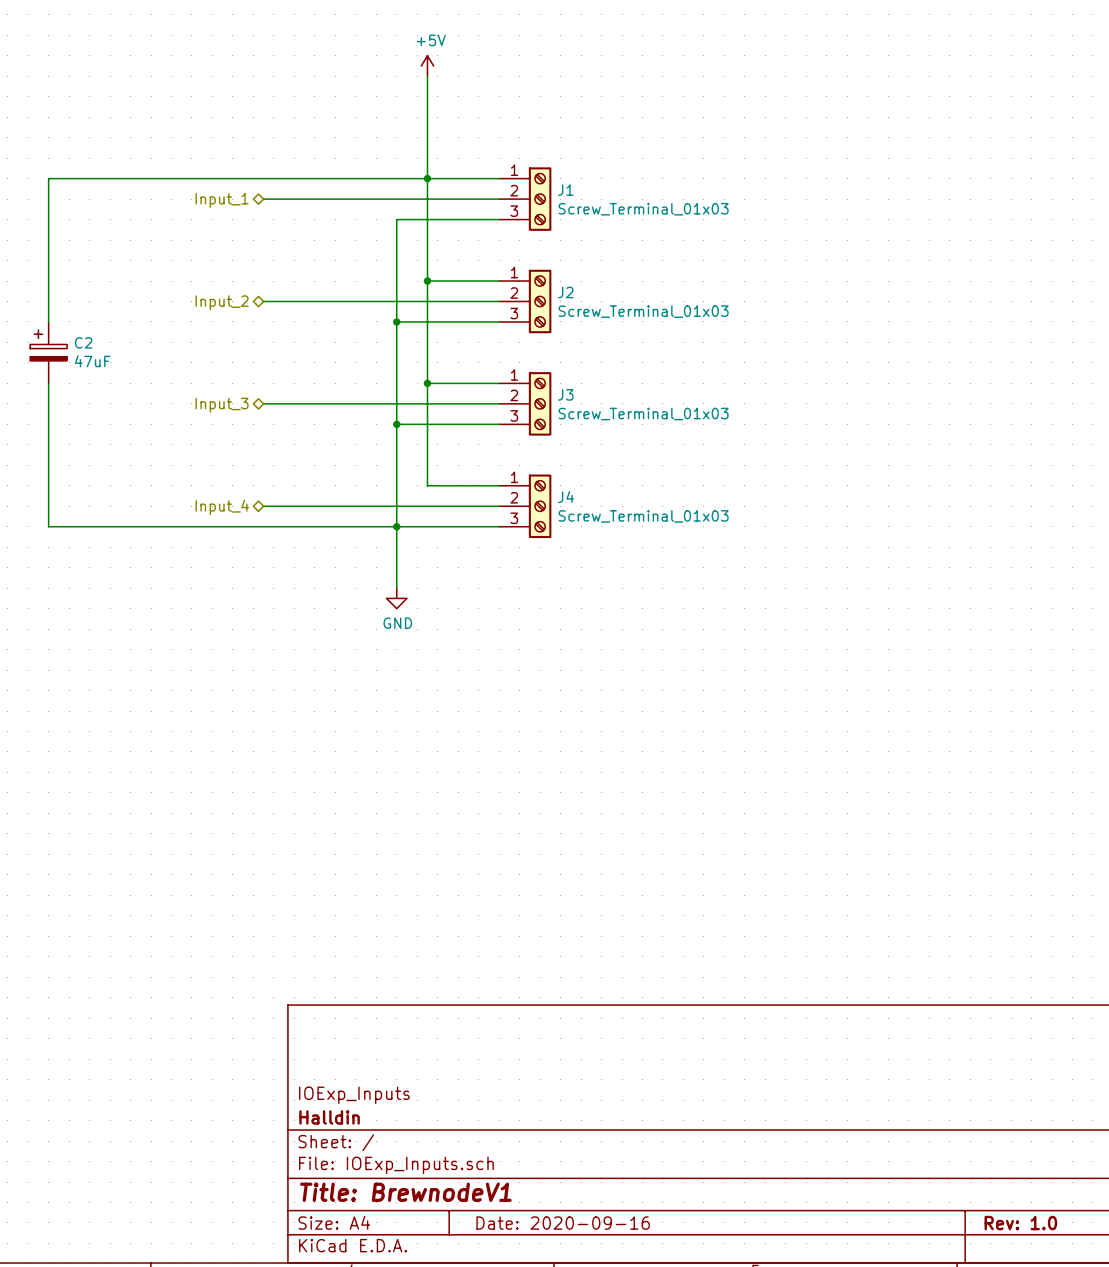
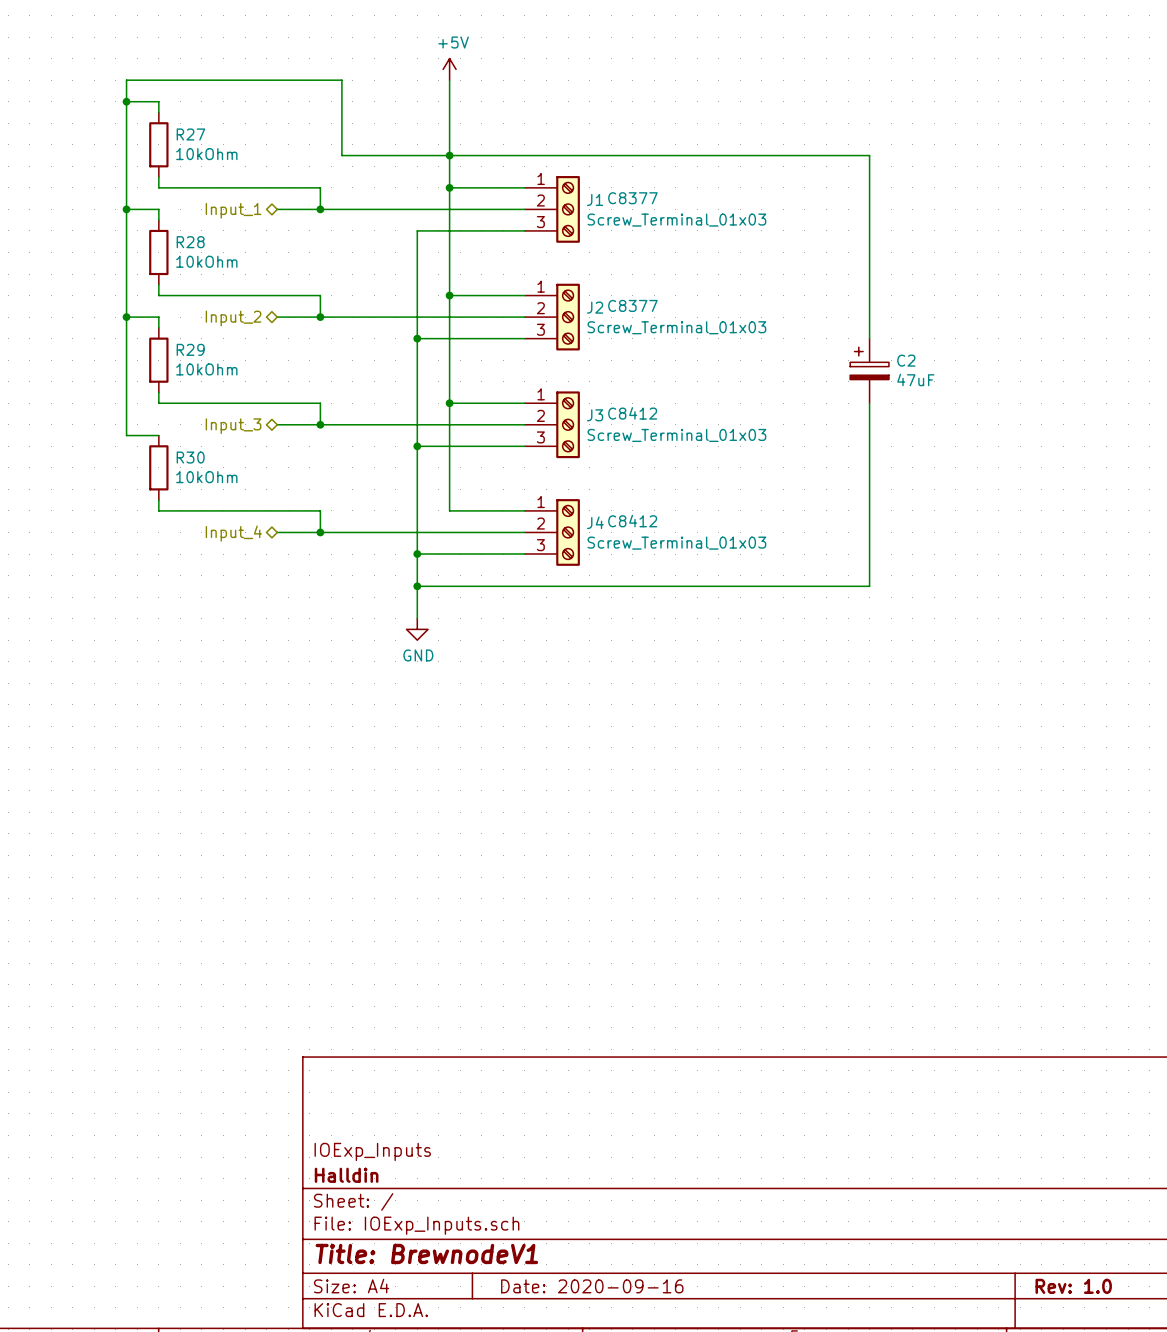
wire: none -> (126, 101) (158, 101) (158, 112)
junction: none -> (126, 101)
R27: none -> 10kOhm (158, 144)
junction: none -> (449, 155)
wire: (151, 178) (48, 178) (48, 321) -> (158, 187) (158, 177)
wire: (304, 178) (427, 178) -> (320, 187) (320, 209)
J1 text: none -> C8377 (632, 198)
wire: none -> (126, 209) (158, 209) (158, 220)
junction: none -> (126, 209)
junction: none -> (320, 209)
R28: none -> 10kOhm (158, 252)
wire: none -> (158, 284) (158, 295) (320, 295) (320, 317)
J2 text: none -> C8377 (632, 305)
wire: none -> (126, 317) (158, 317) (158, 327)
junction: none -> (126, 317)
junction: none -> (320, 317)
wire: none -> (869, 338) (869, 155) (341, 155) (341, 80) (126, 80) (126, 435) (158, 435)
R29: none -> 10kOhm (158, 360)
C2 position: (48, 352) -> (869, 370)
wire: none -> (158, 392) (158, 403) (320, 403) (320, 424)
wire: (48, 383) (48, 526) (396, 526) -> none
wire: none -> (869, 403) (869, 586) (417, 586)
J3 text: none -> C8412 (632, 413)
junction: none -> (320, 424)
R30: none -> 10kOhm (158, 467)
wire: none -> (158, 500) (158, 510) (320, 510) (320, 532)
J4 text: none -> C8412 (632, 521)
junction: none -> (320, 532)
junction: none -> (417, 586)

